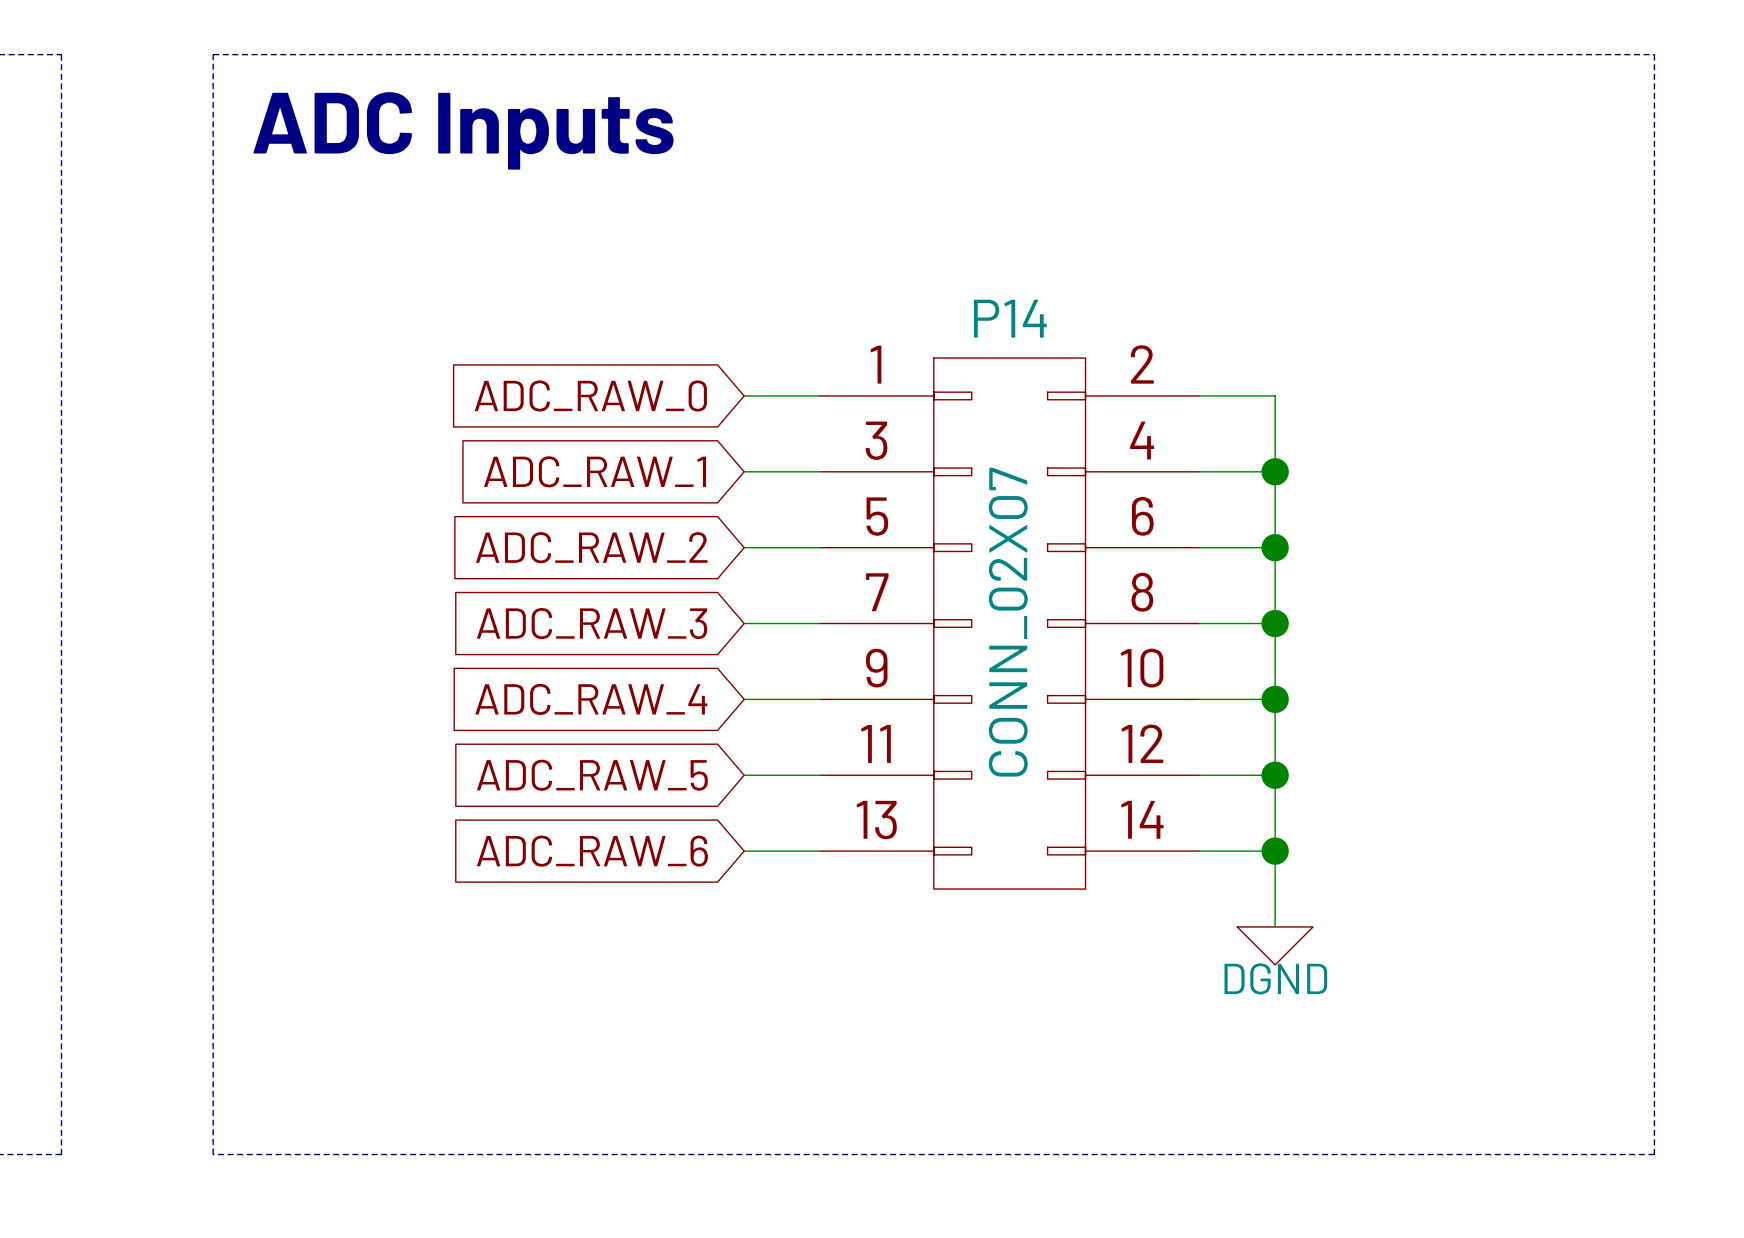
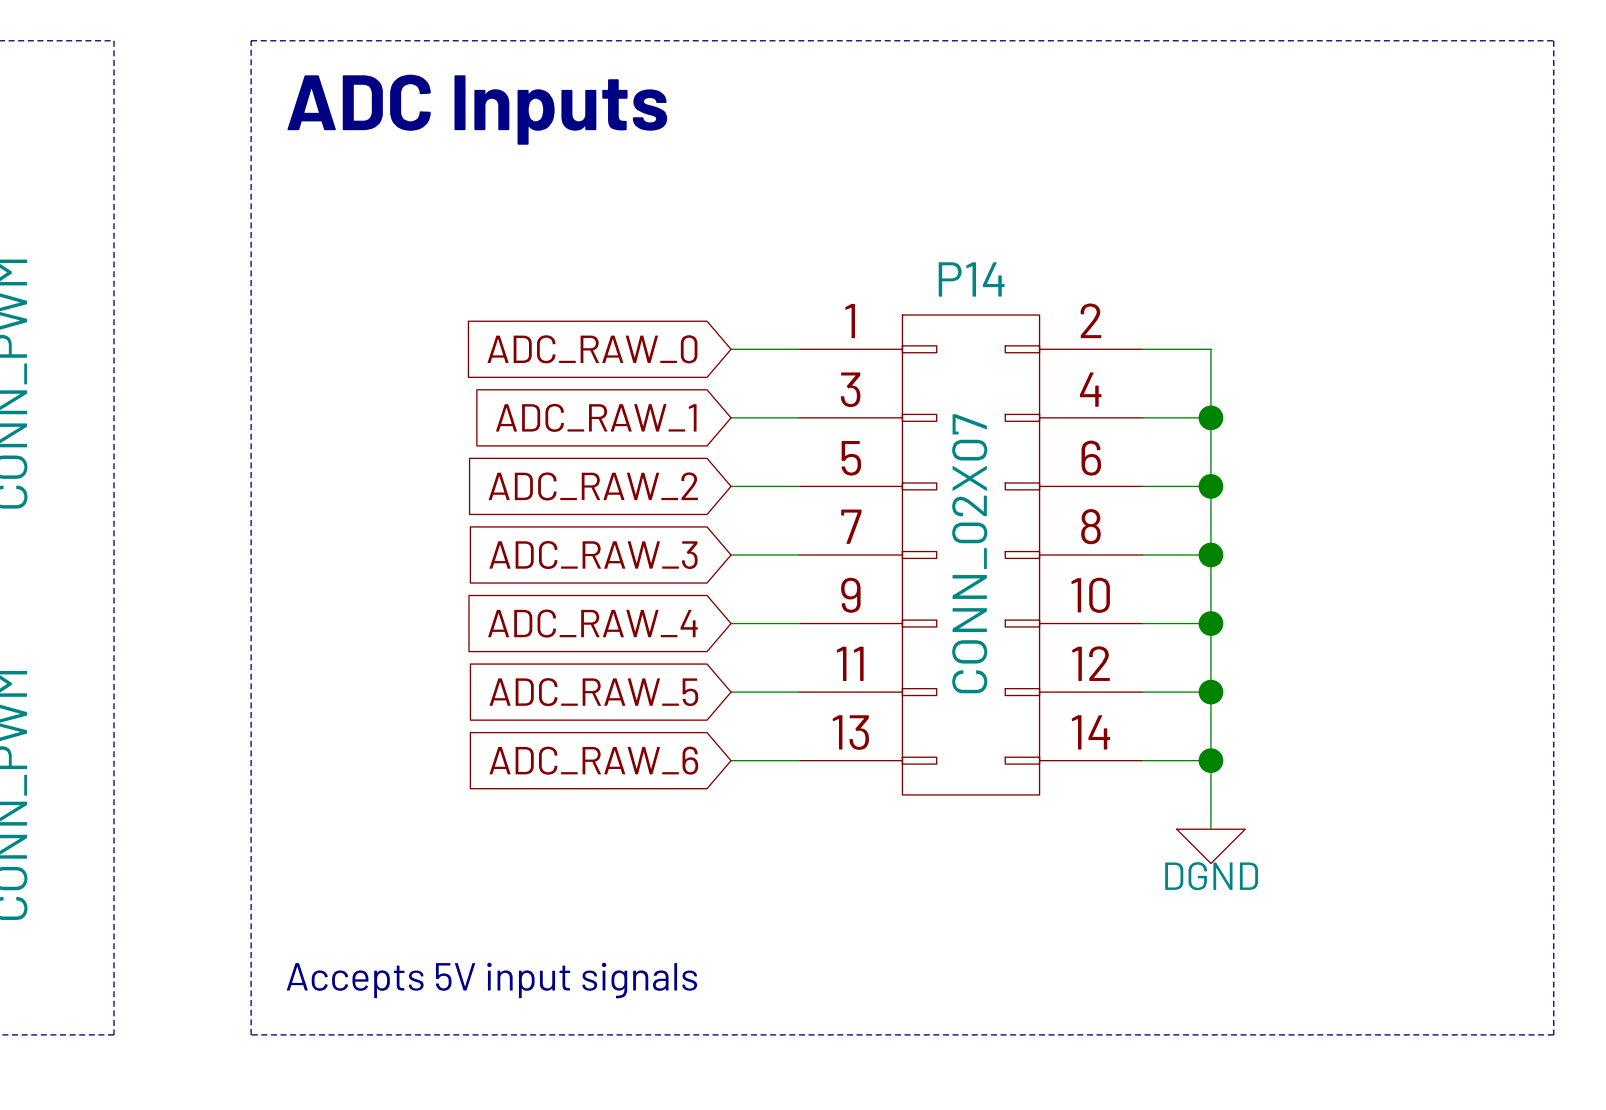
text: none -> Accepts 5V input signals (491, 980)

